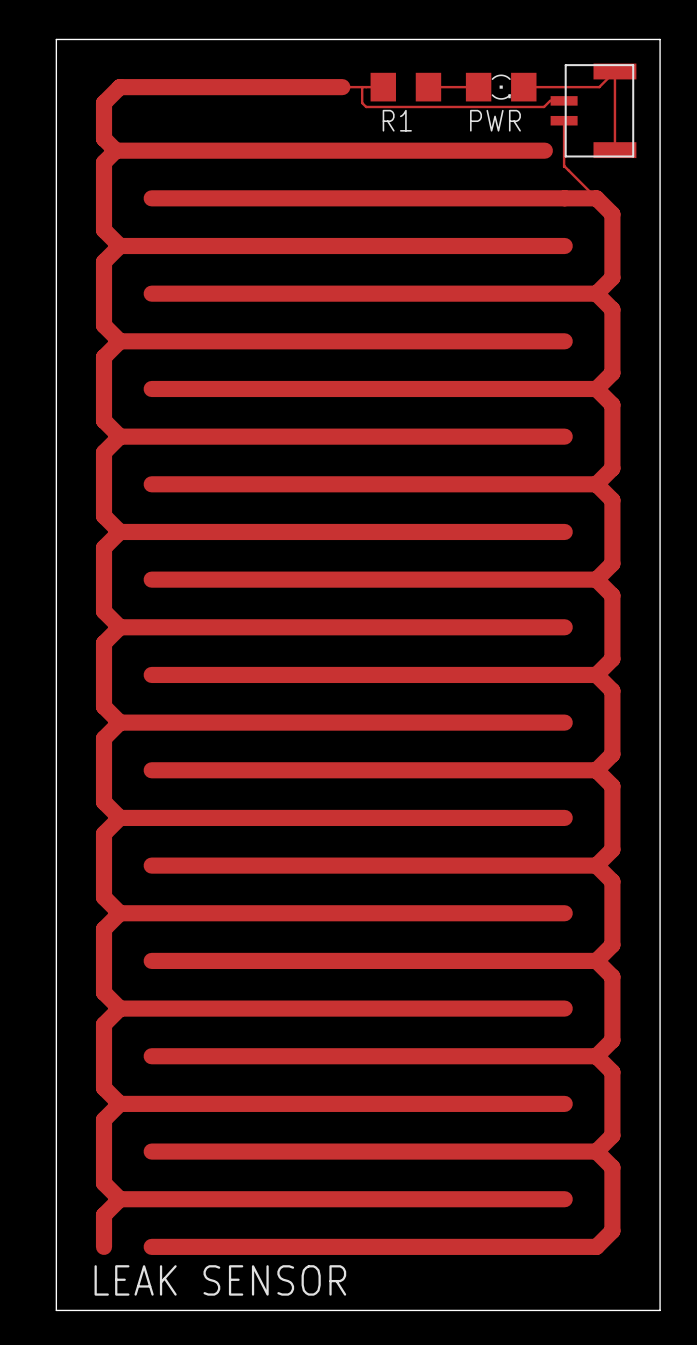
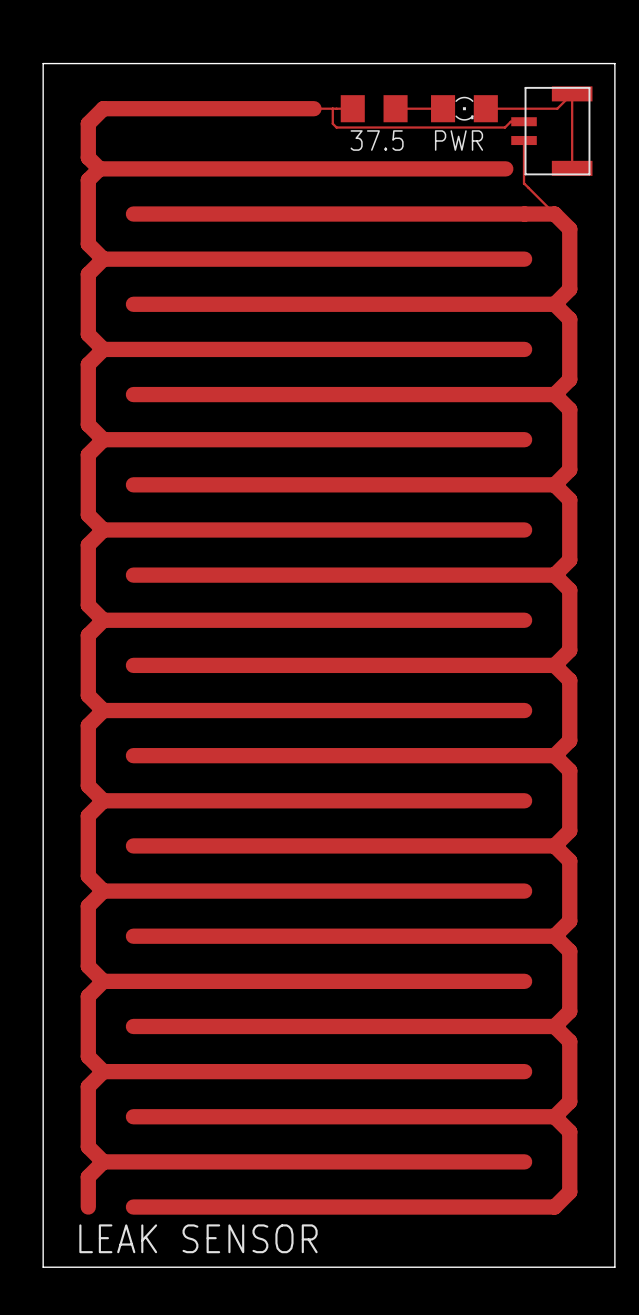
R1 name: R1 (397, 120) -> 37.5 (377, 140)

